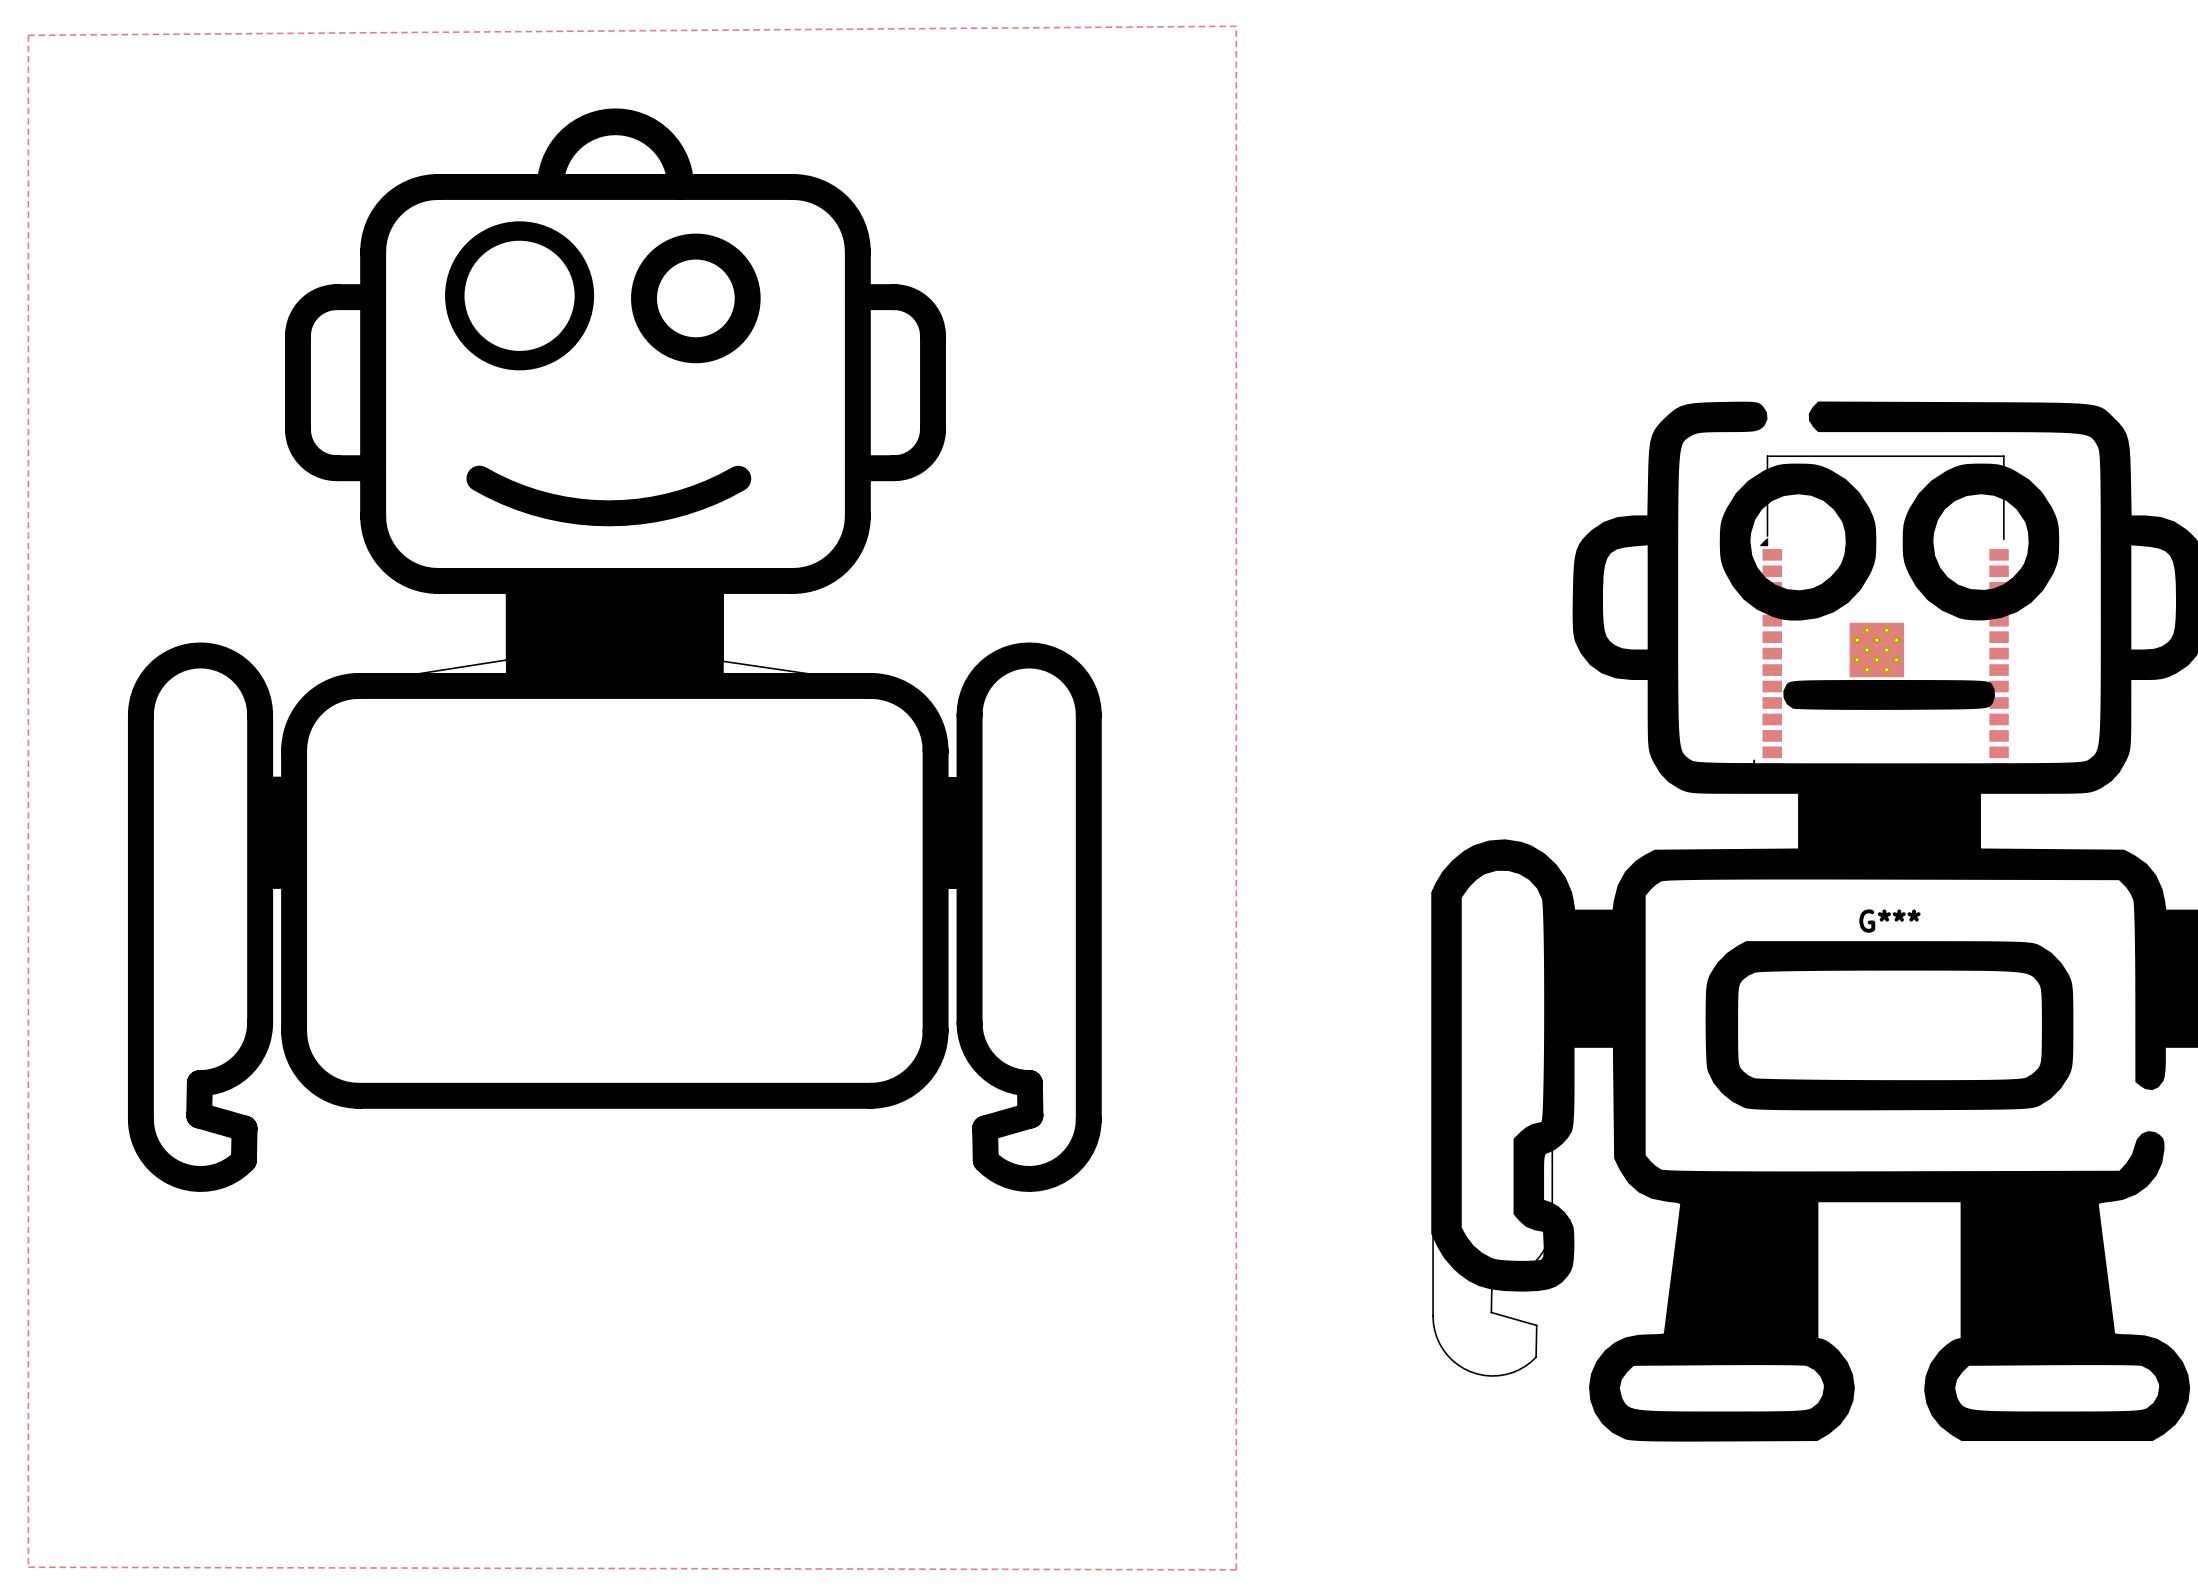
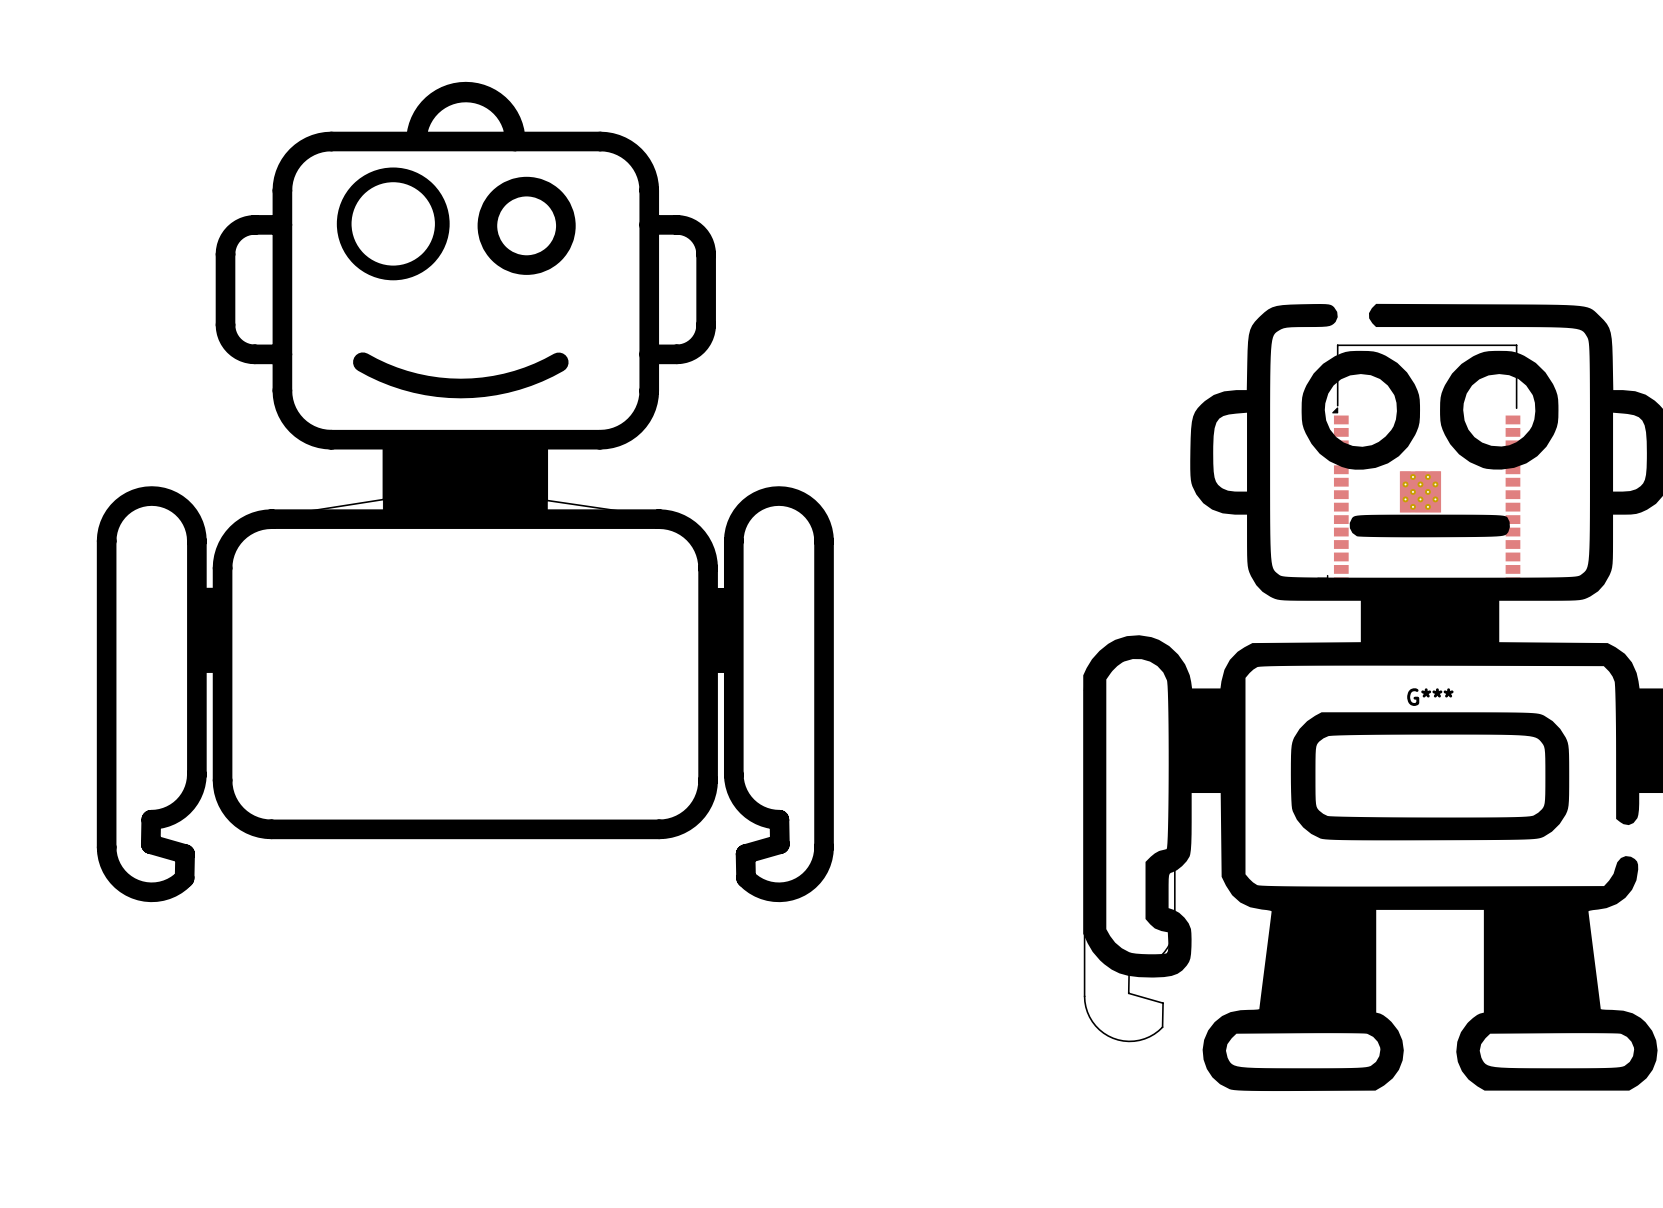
top zone outline: (1236, 26) (1236, 1569) (28, 1567) (28, 35) (1236, 26) -> none

